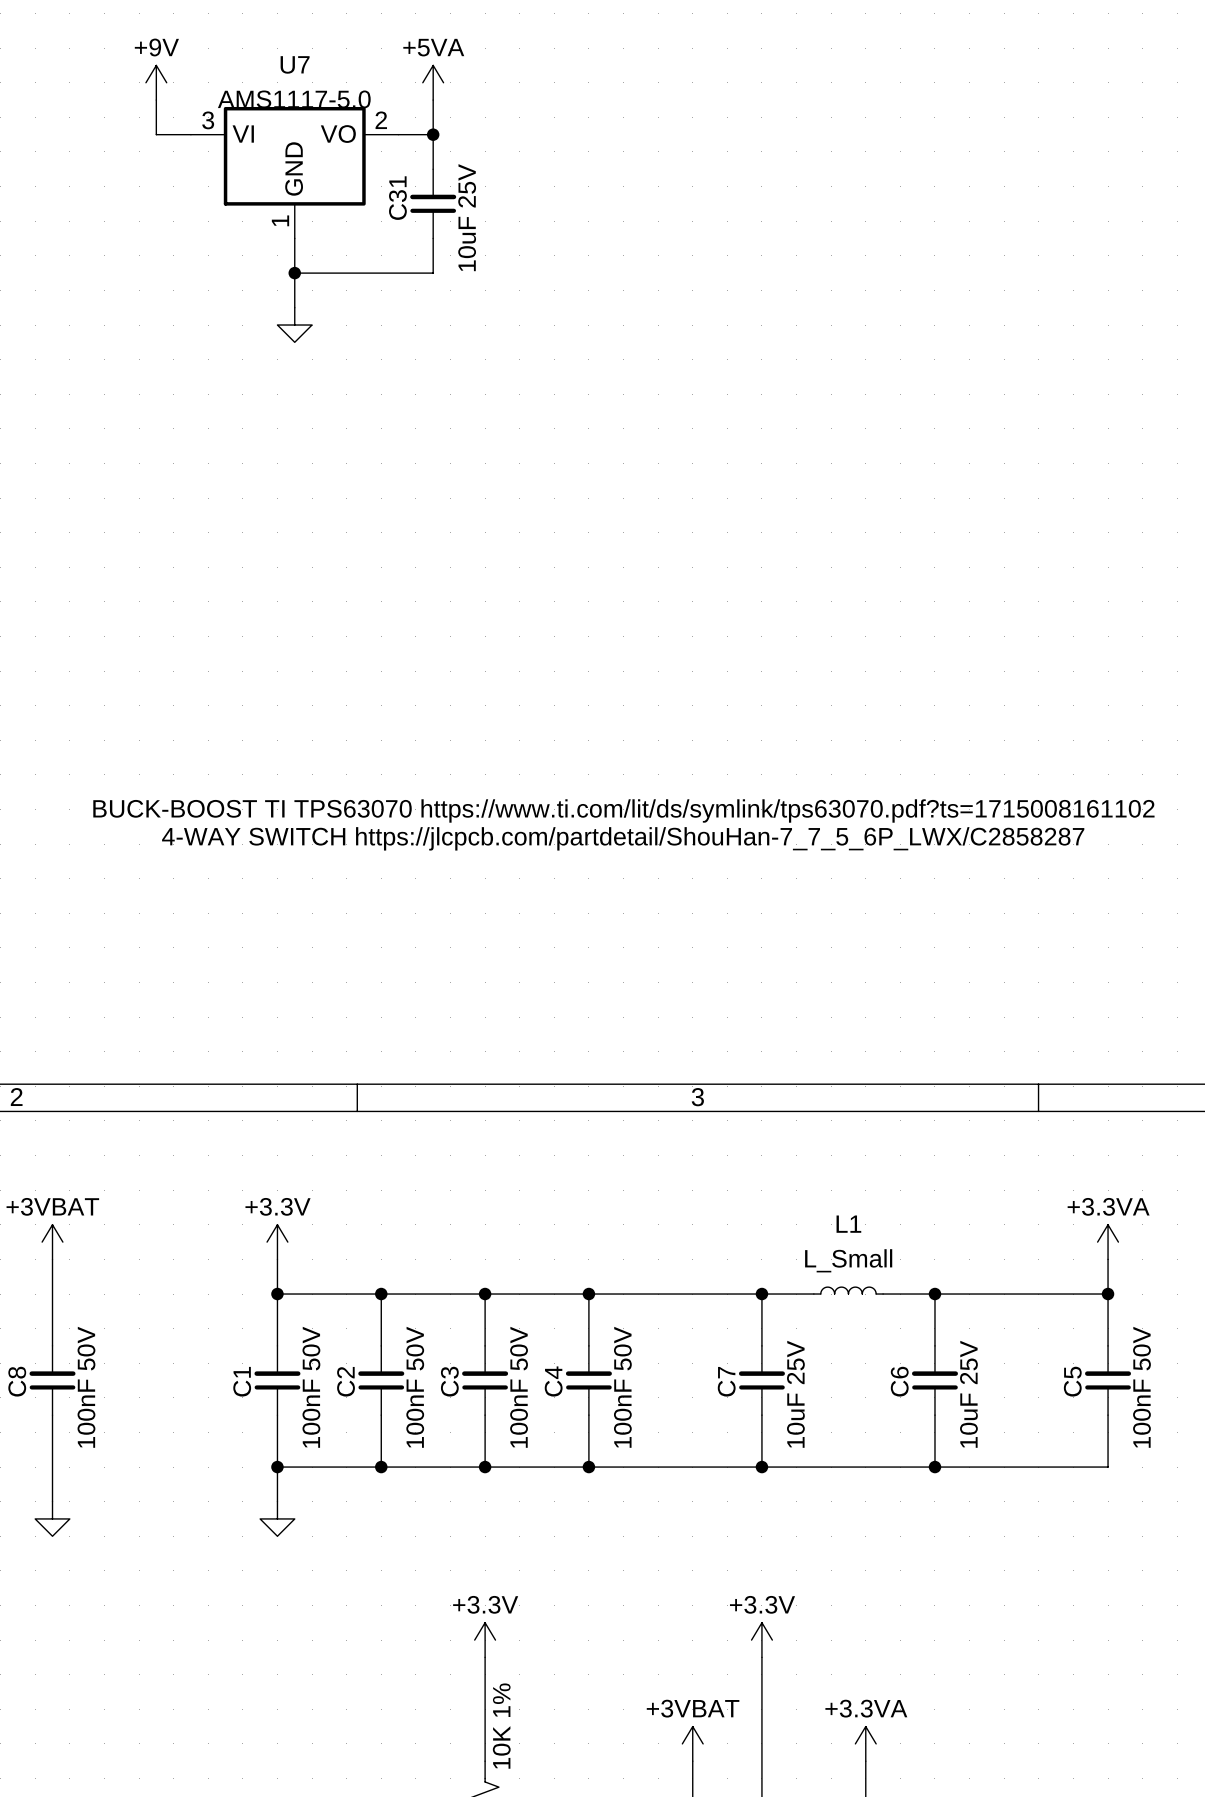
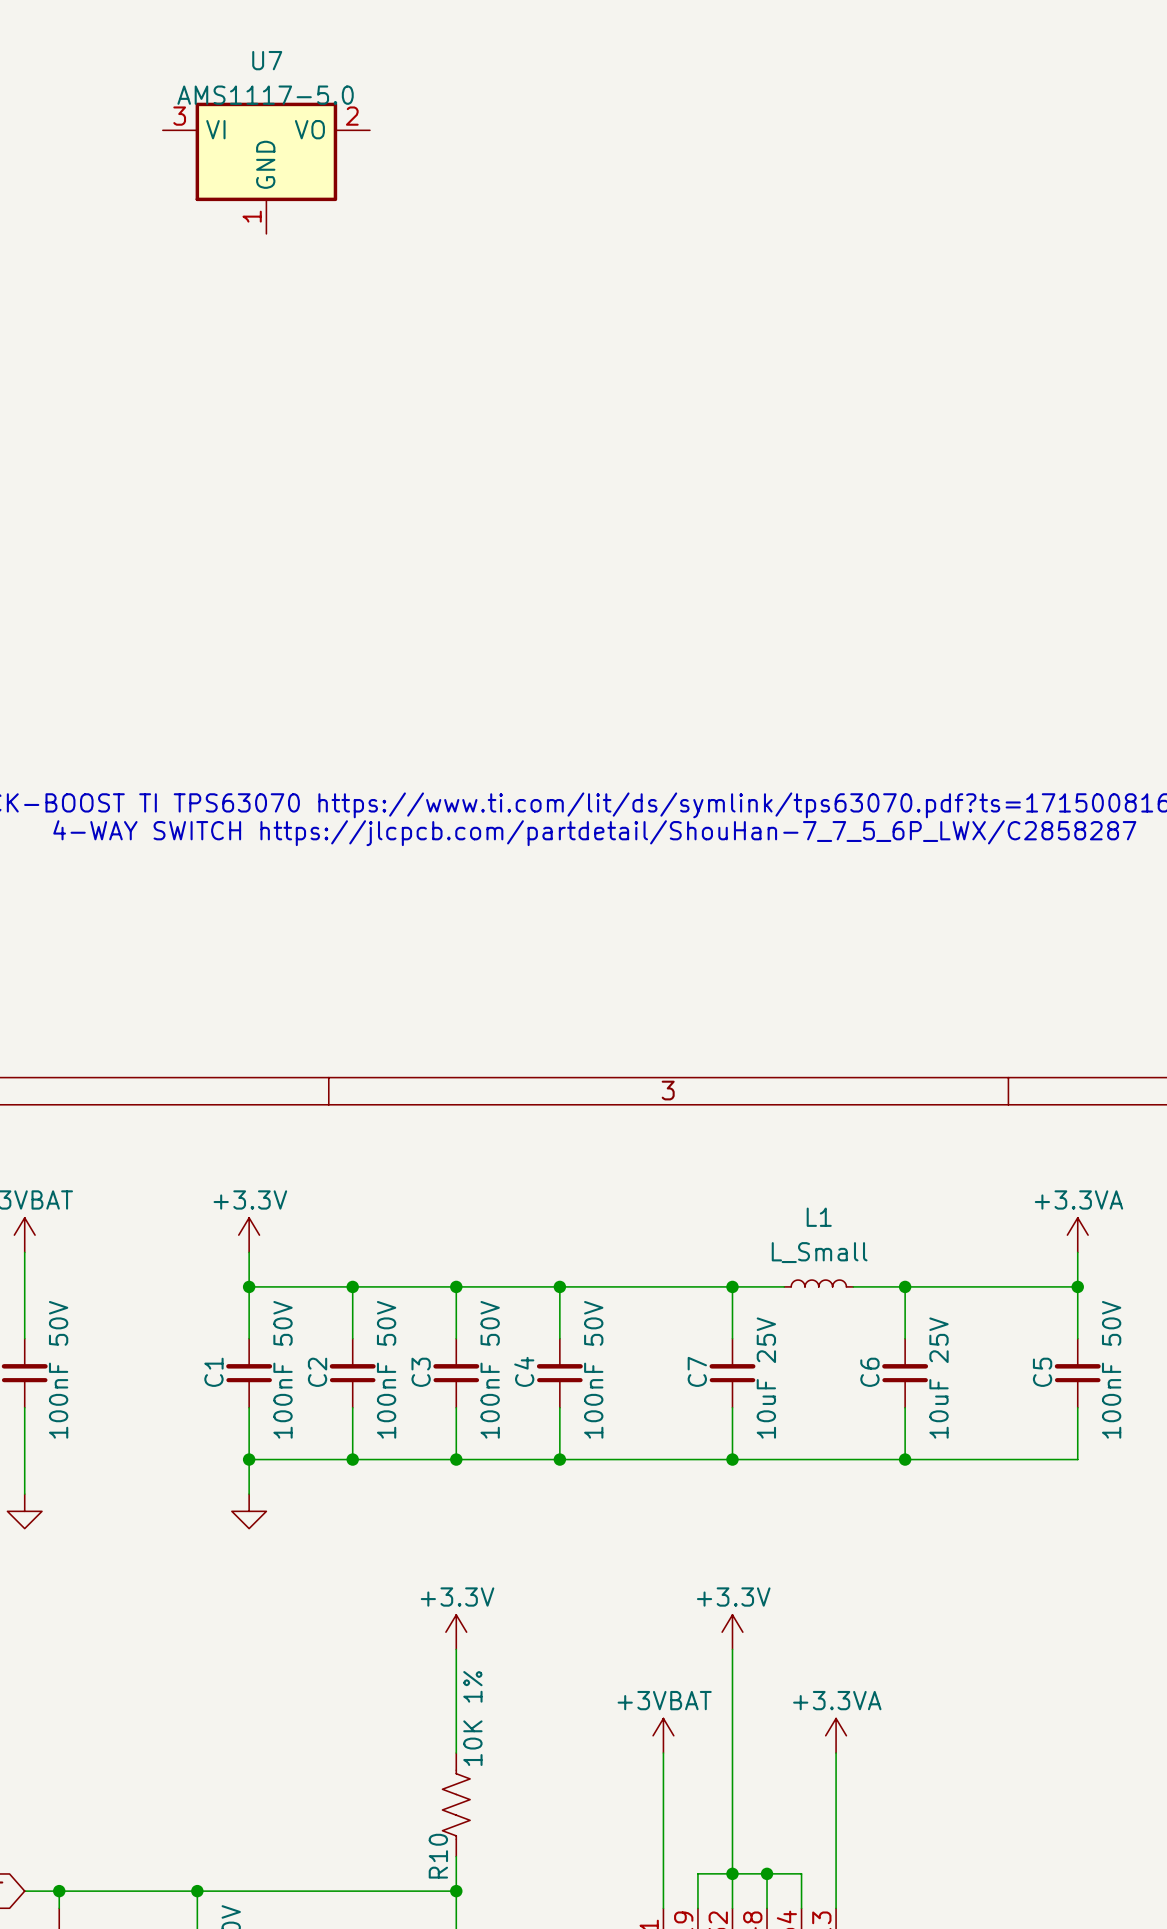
power symbol: +9V (156, 82) -> none
power symbol: +5VA (433, 82) -> none
wire: (156, 100) (156, 134) (190, 134) -> none
wire: (433, 100) (433, 169) -> none
wire: (398, 134) (433, 134) -> none
junction: (433, 134) -> none
C31: 10uF 25V (433, 203) -> none
wire: (294, 238) (294, 307) -> none
wire: (433, 238) (433, 273) (294, 273) -> none
junction: (294, 273) -> none
power symbol: (294, 325) -> none

